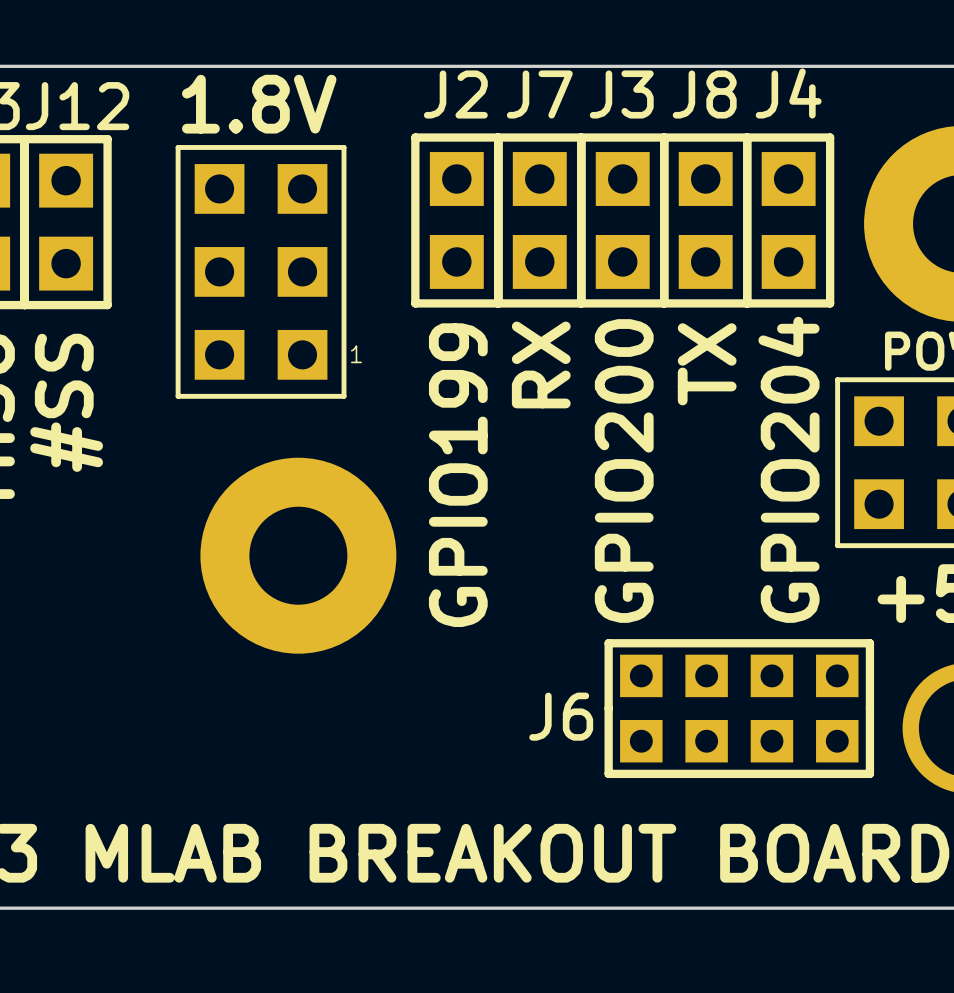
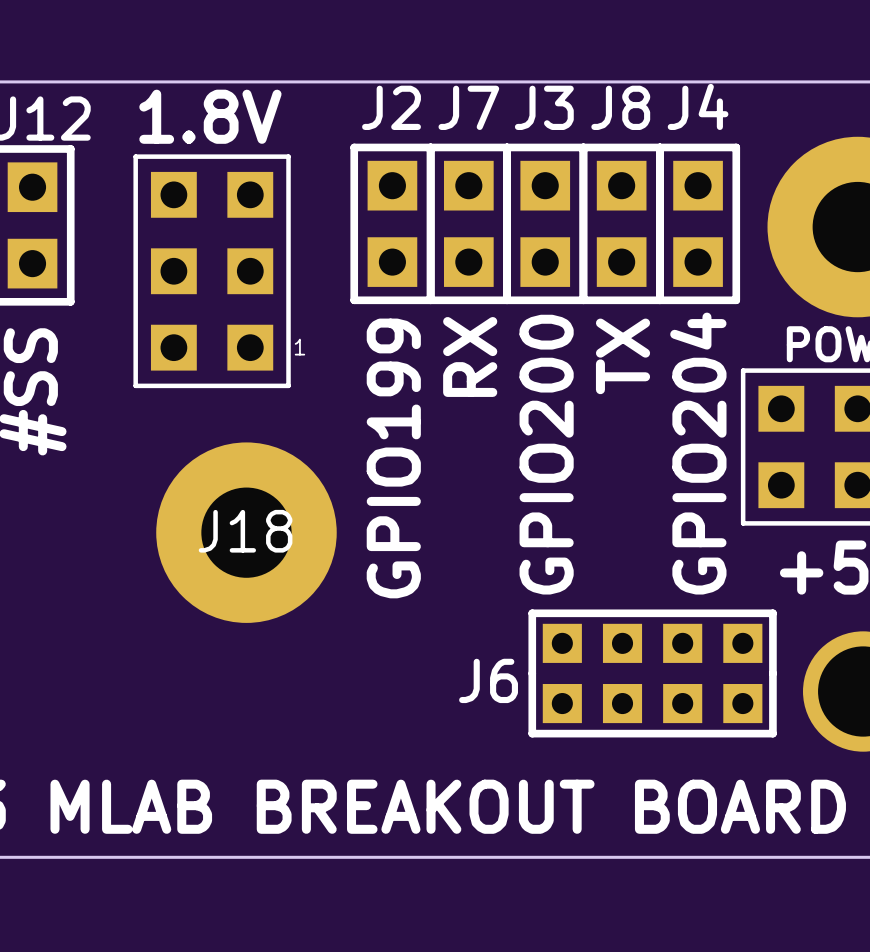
J18 name: none -> J18 (245, 531)

